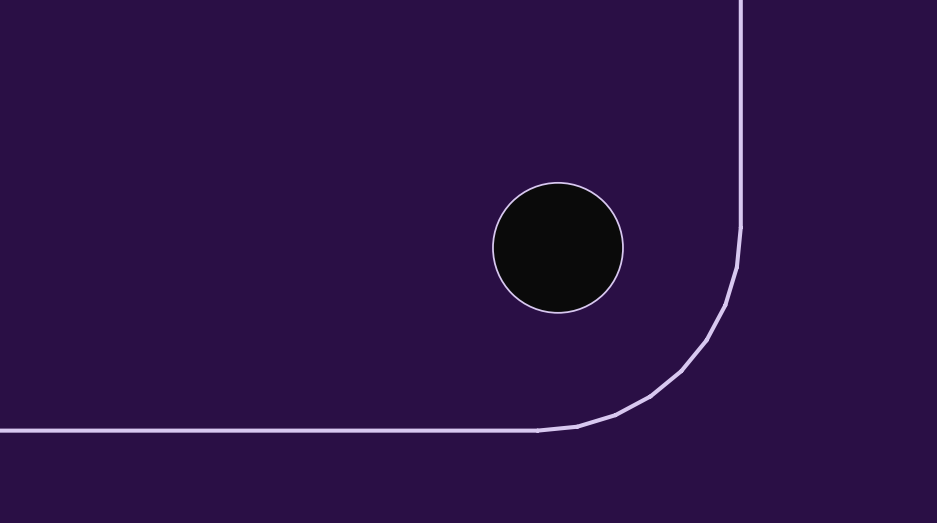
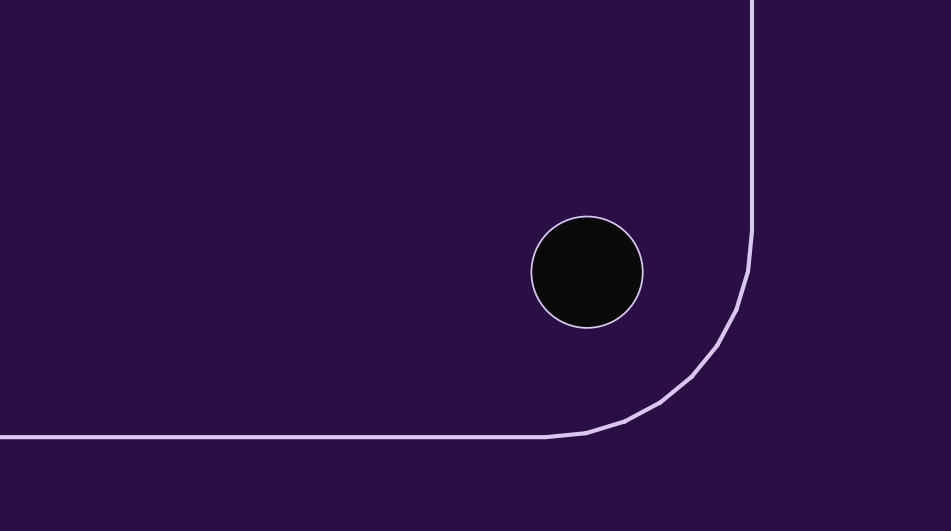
part footprint: [492, 182, 623, 313] -> [531, 216, 643, 328]

